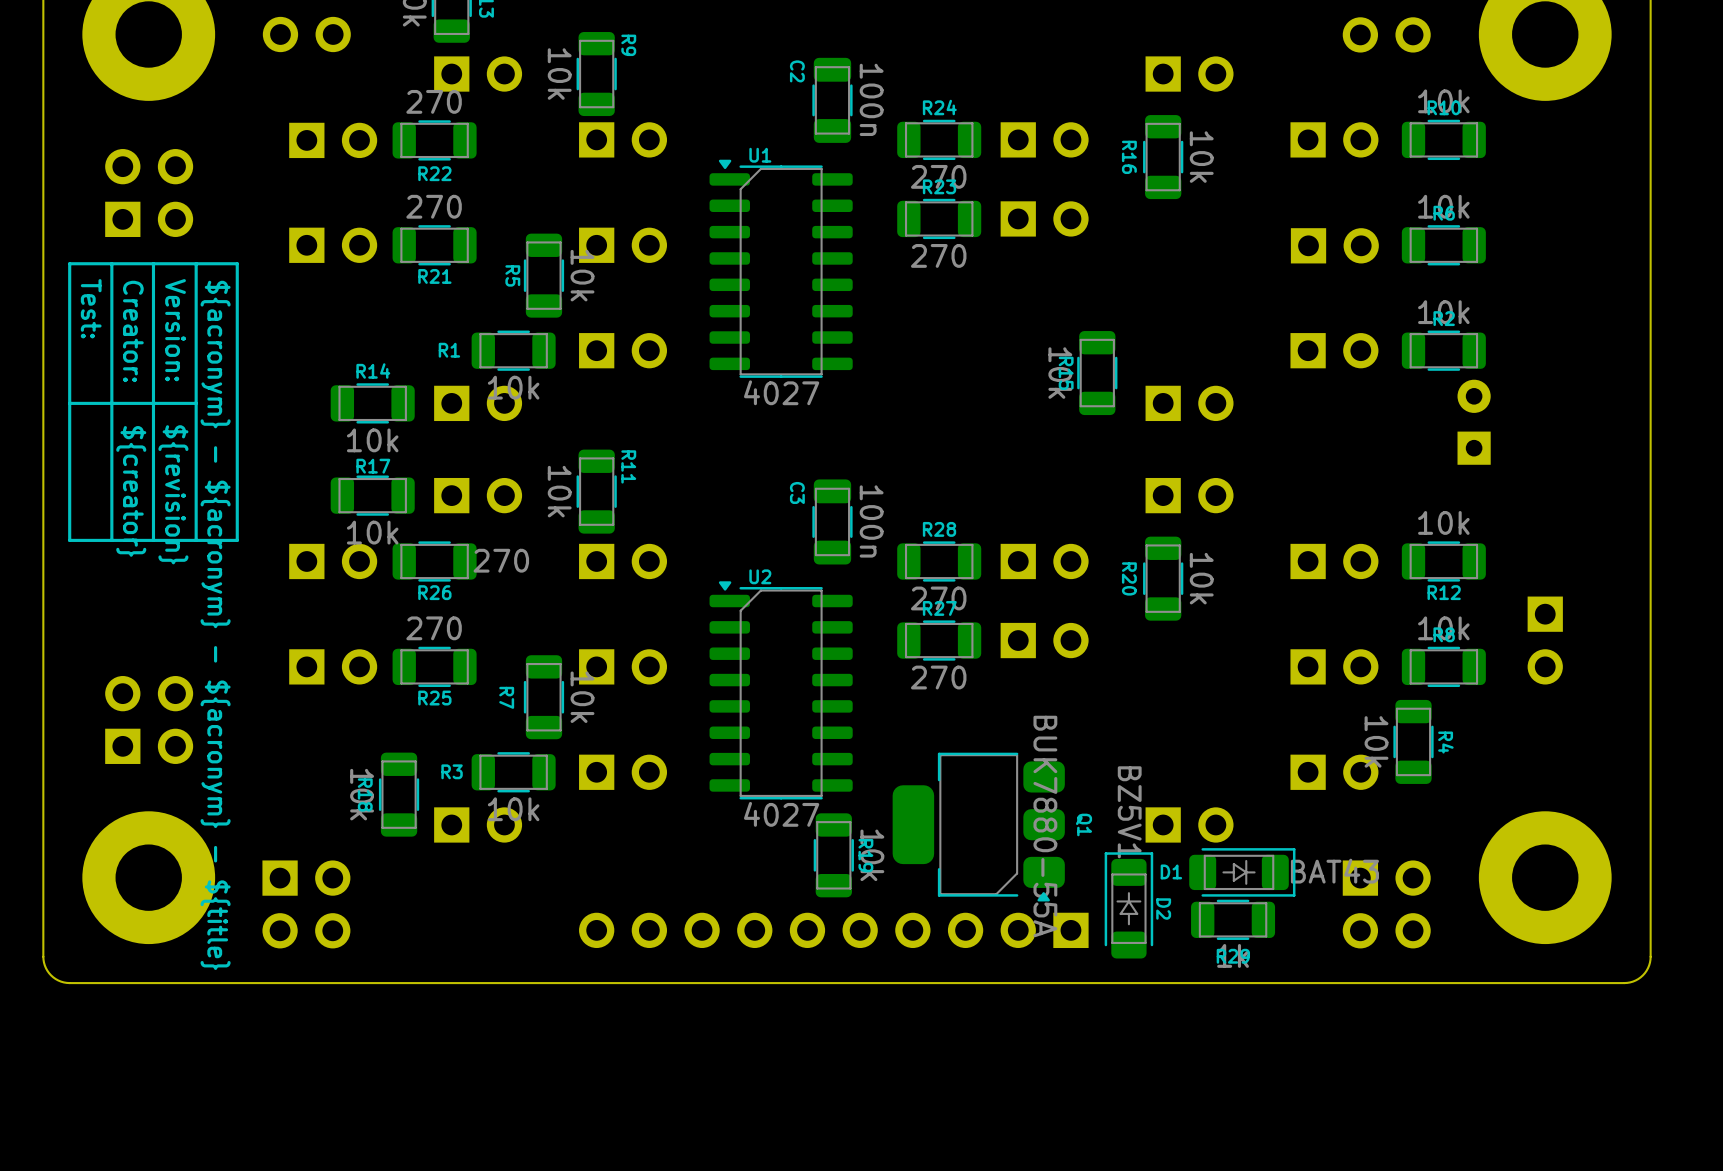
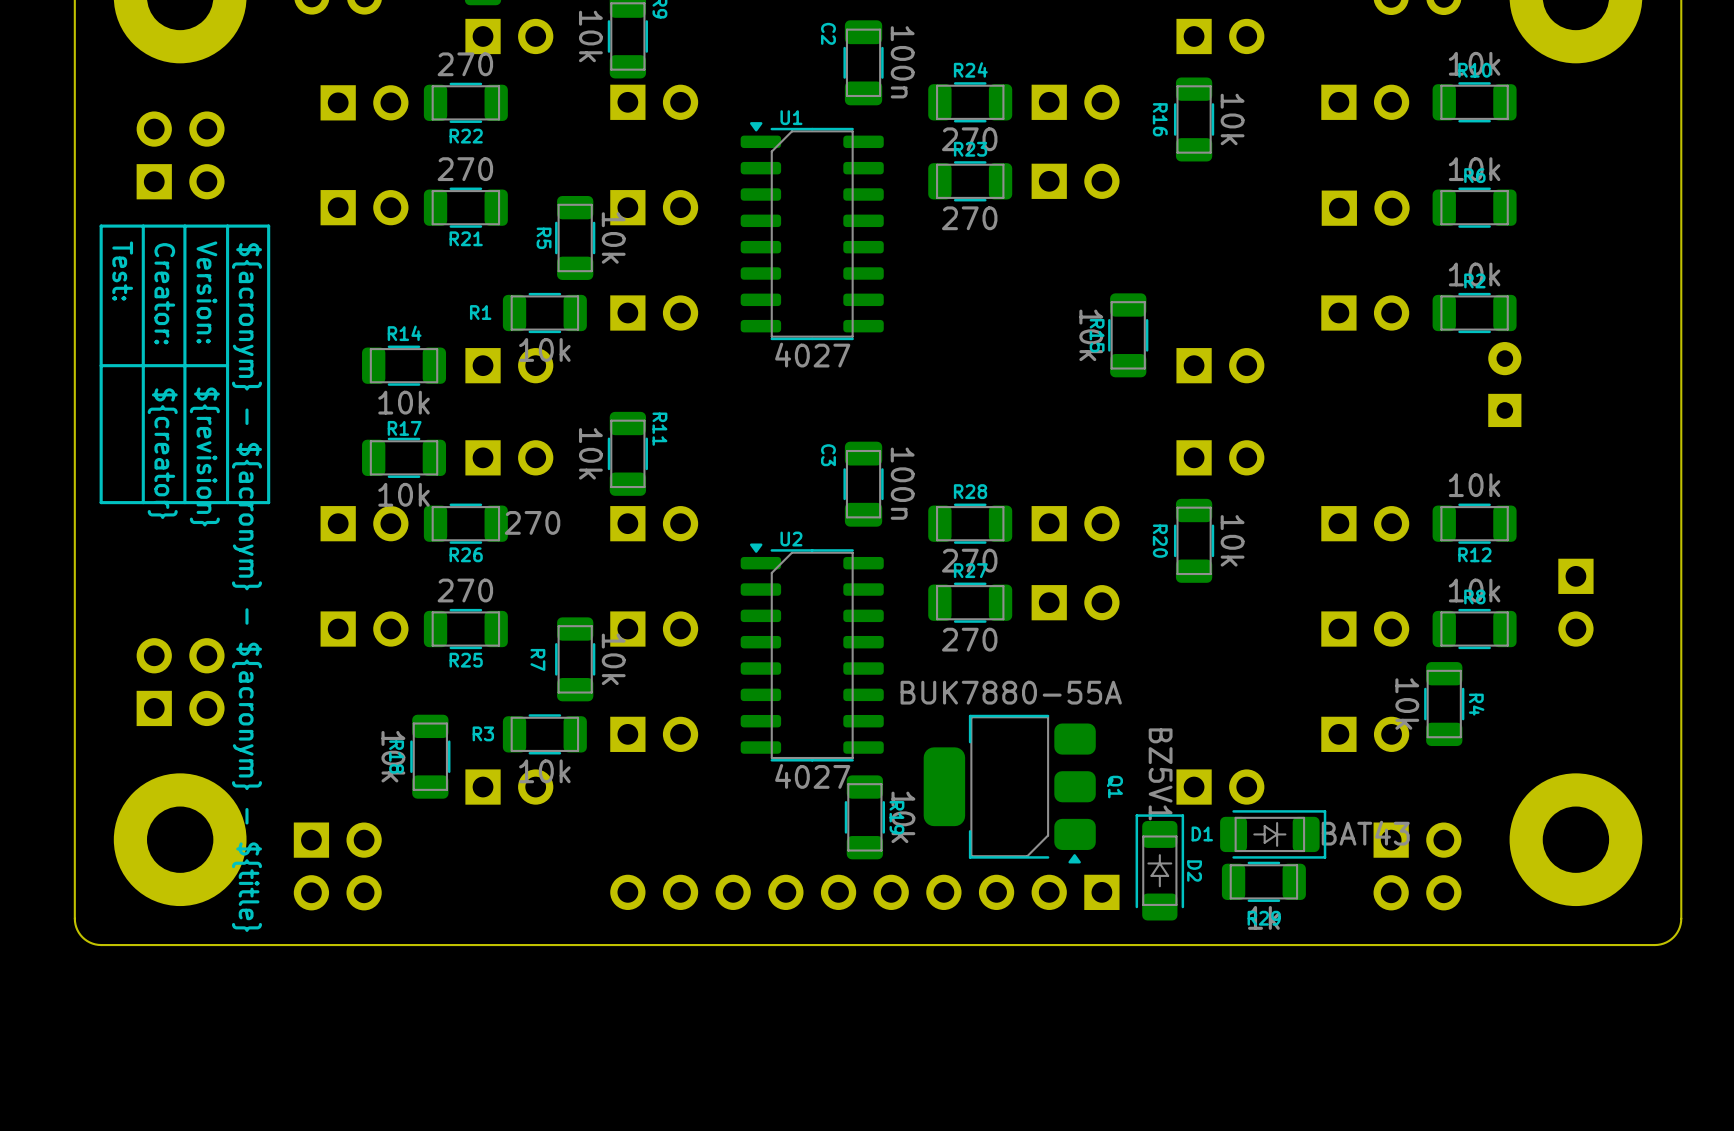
Q1 value rotation: 0° (1045, 826) -> 90° counterclockwise (1011, 692)

